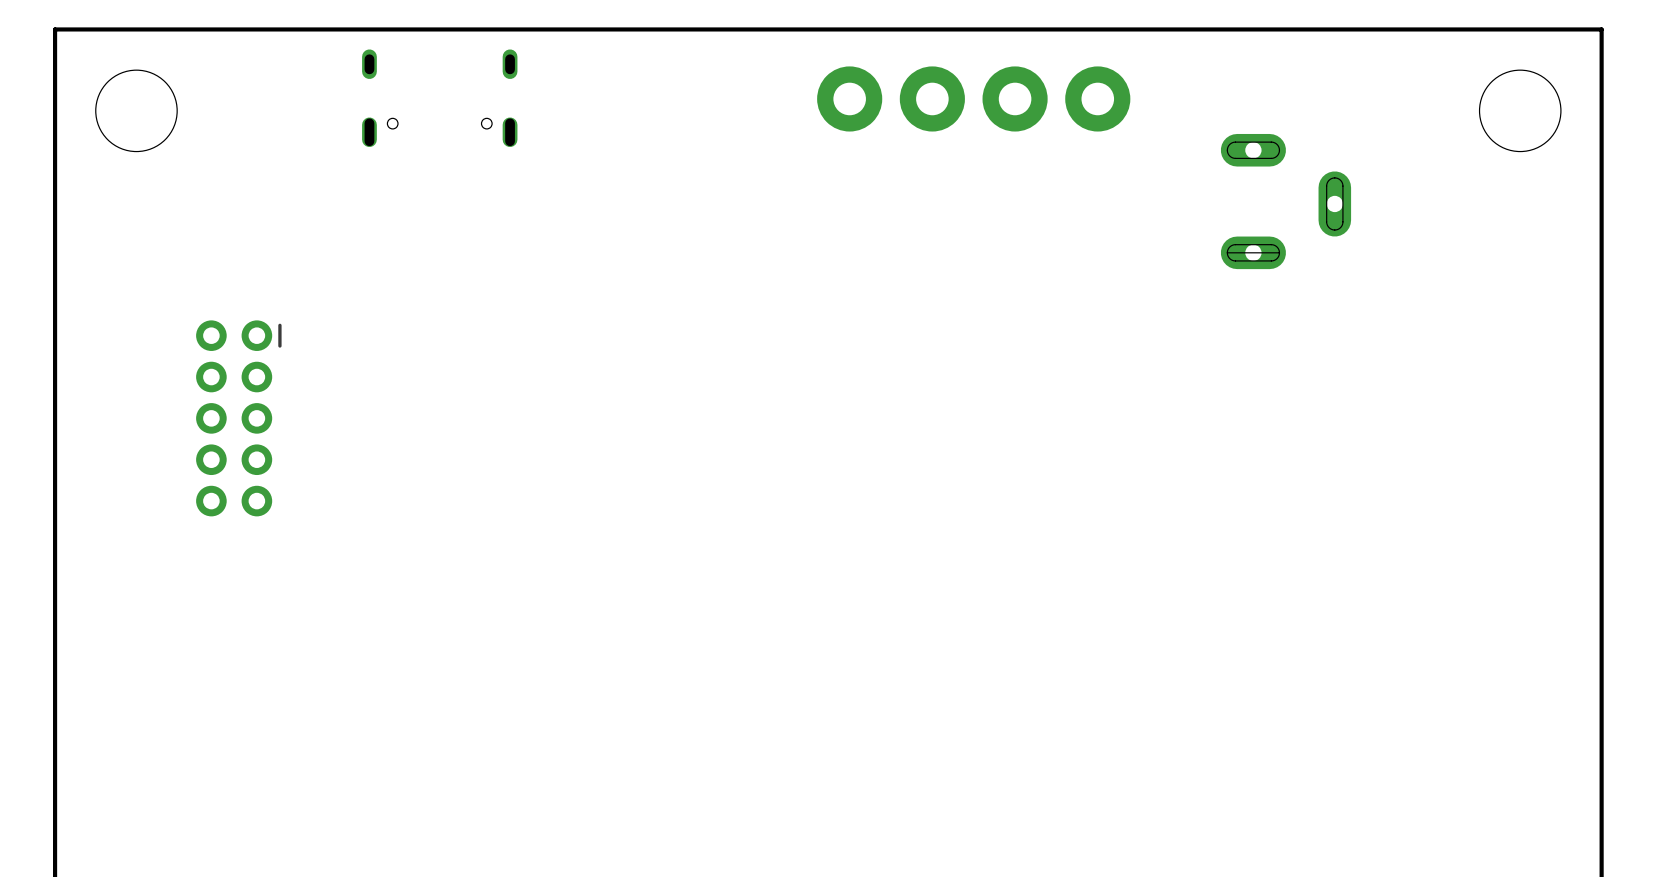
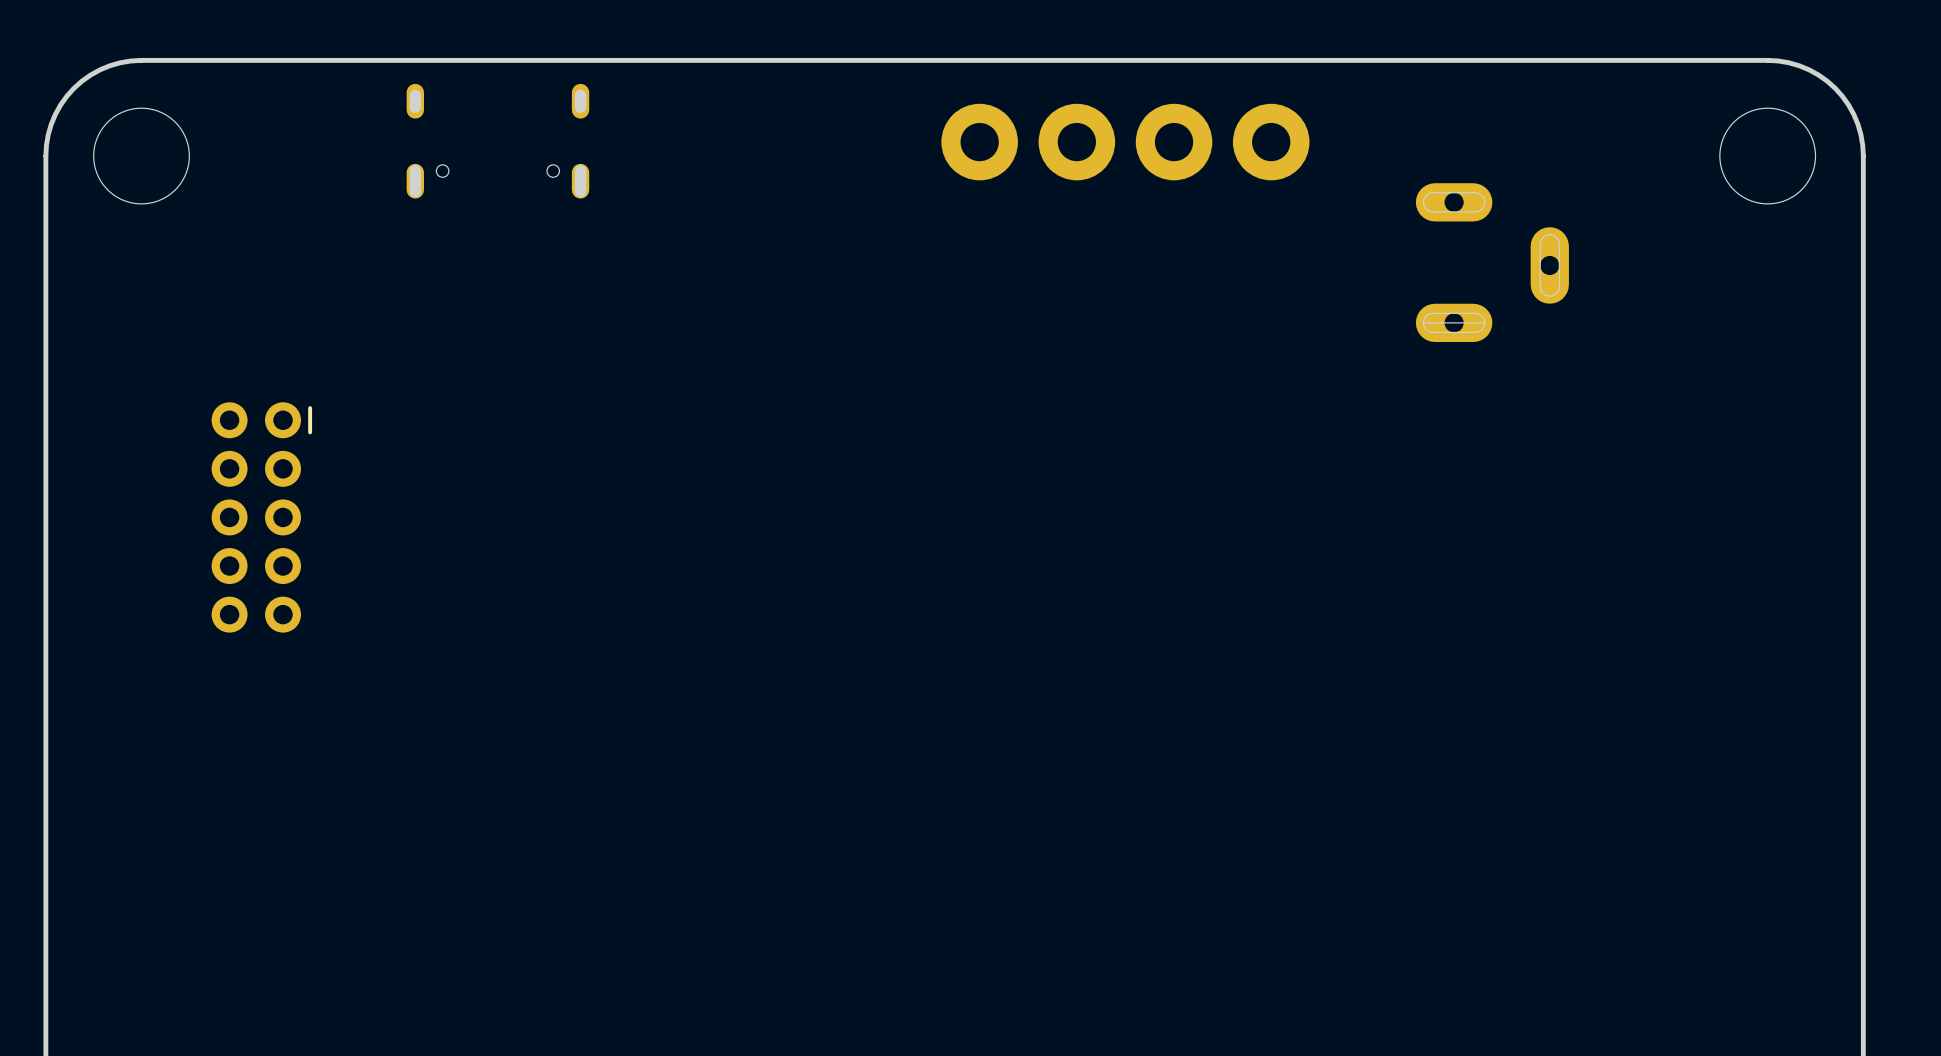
board edge: (136, 29) (55, 29) (55, 110) -> (141, 60) (109, 65) (90, 75) (73, 88) (60, 105) (51, 124) (45, 156)
board edge: (1520, 29) (1601, 29) (1601, 110) -> (1767, 60) (1799, 65) (1818, 75) (1835, 88) (1848, 105) (1857, 124) (1863, 156)

